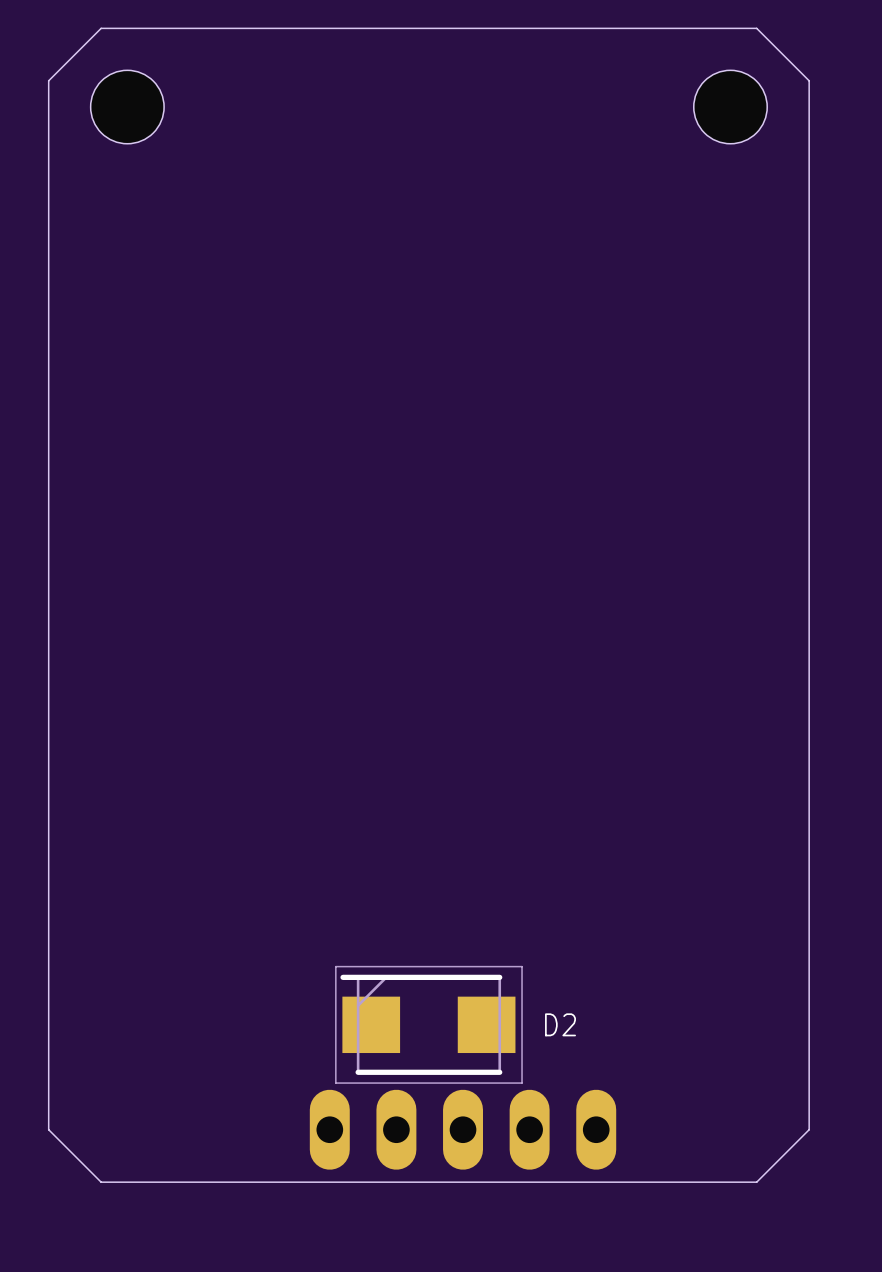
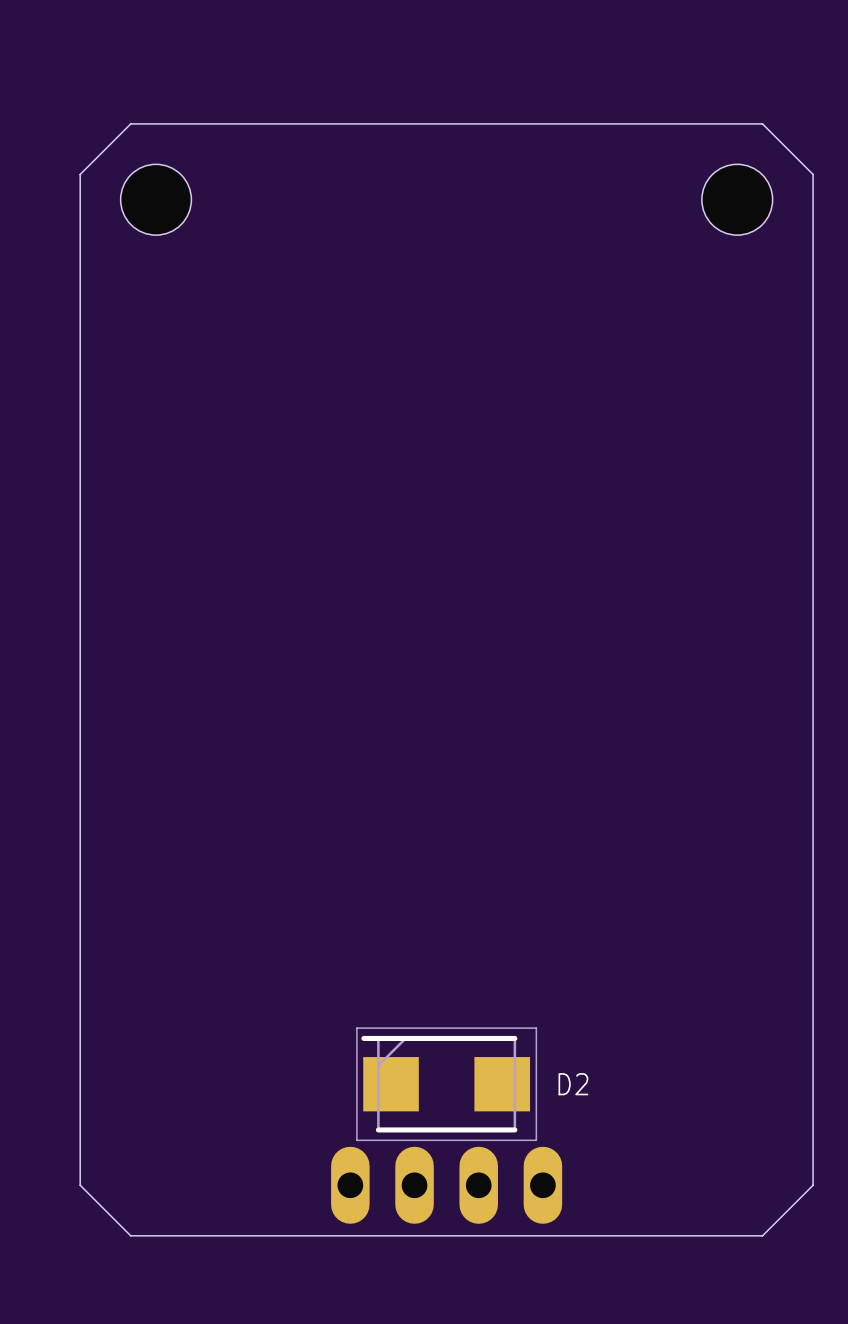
part: none -> (446, 1185)
part: (463, 1129) -> none

